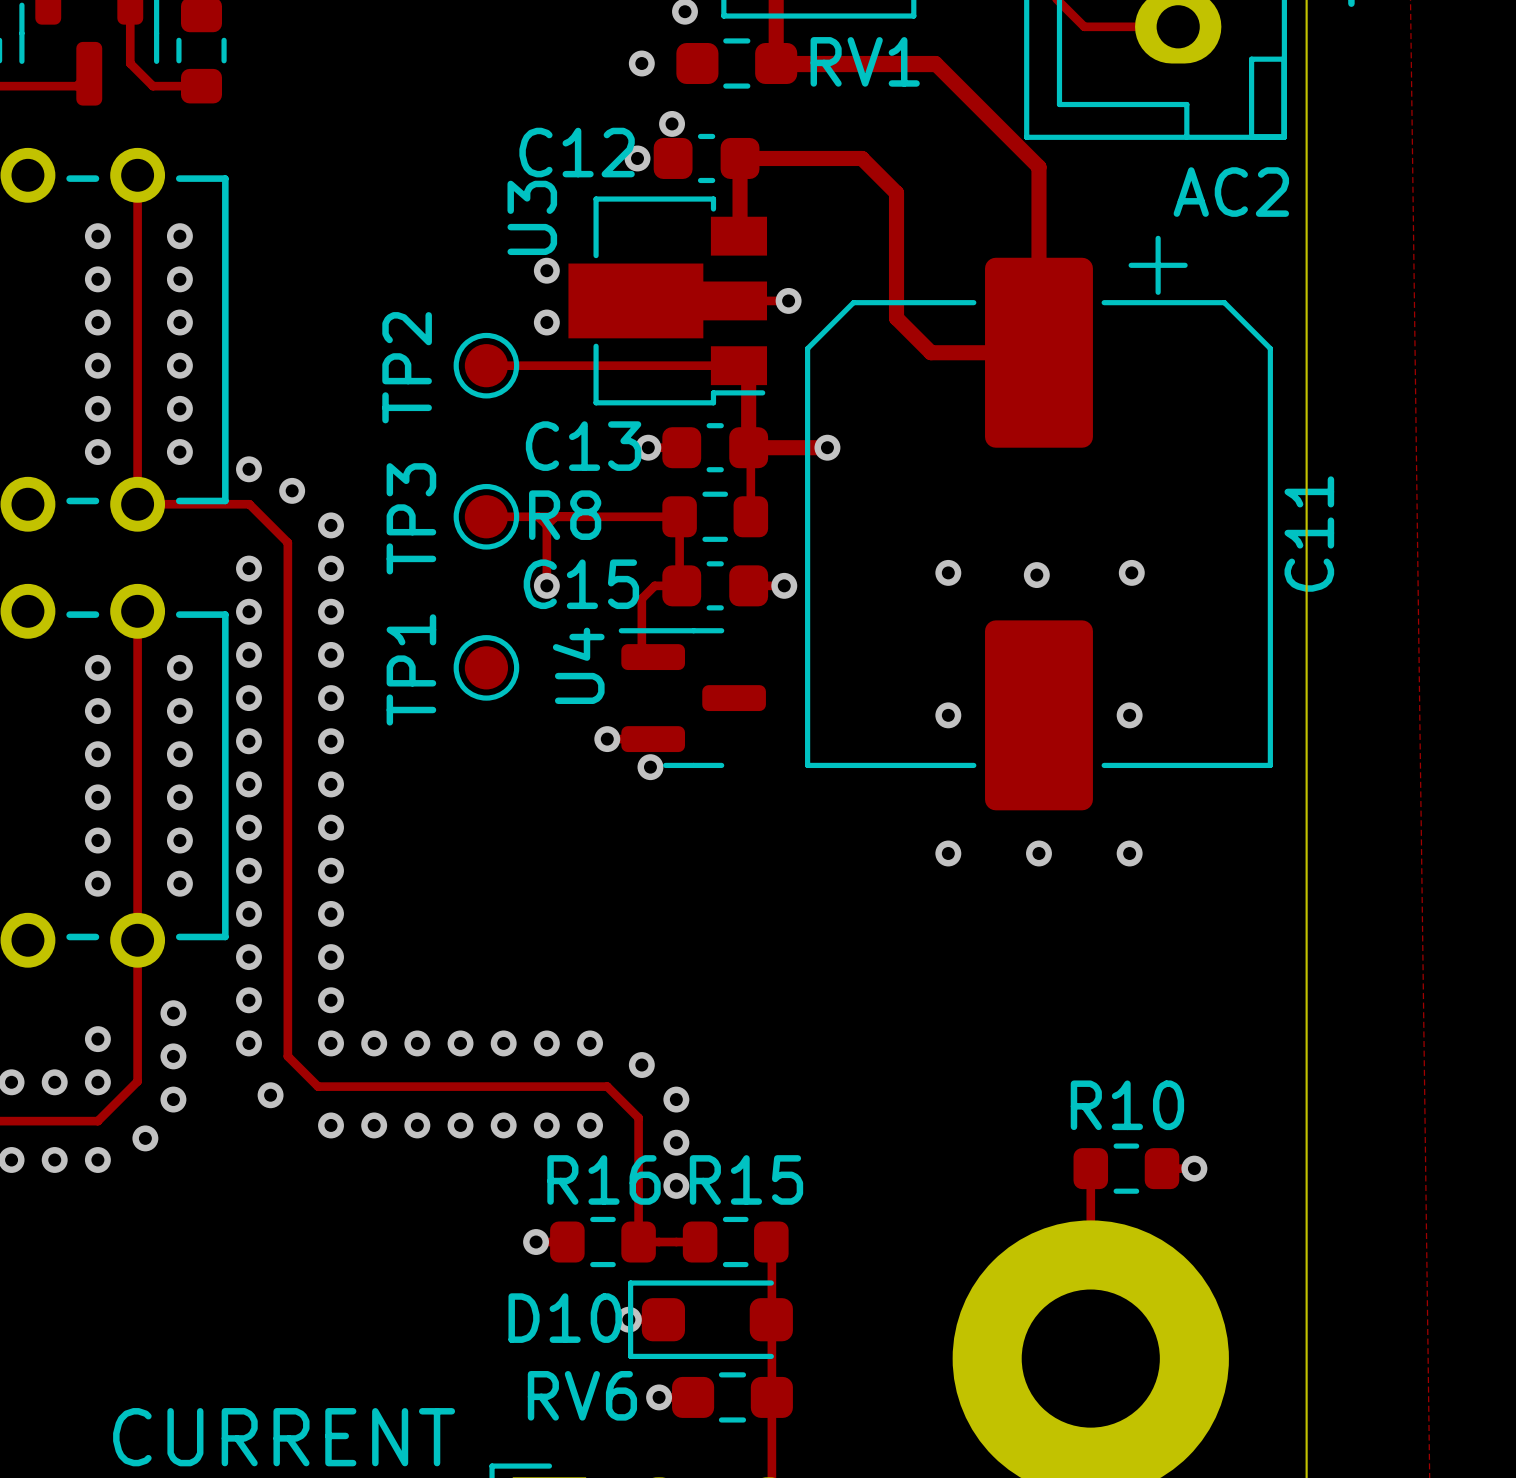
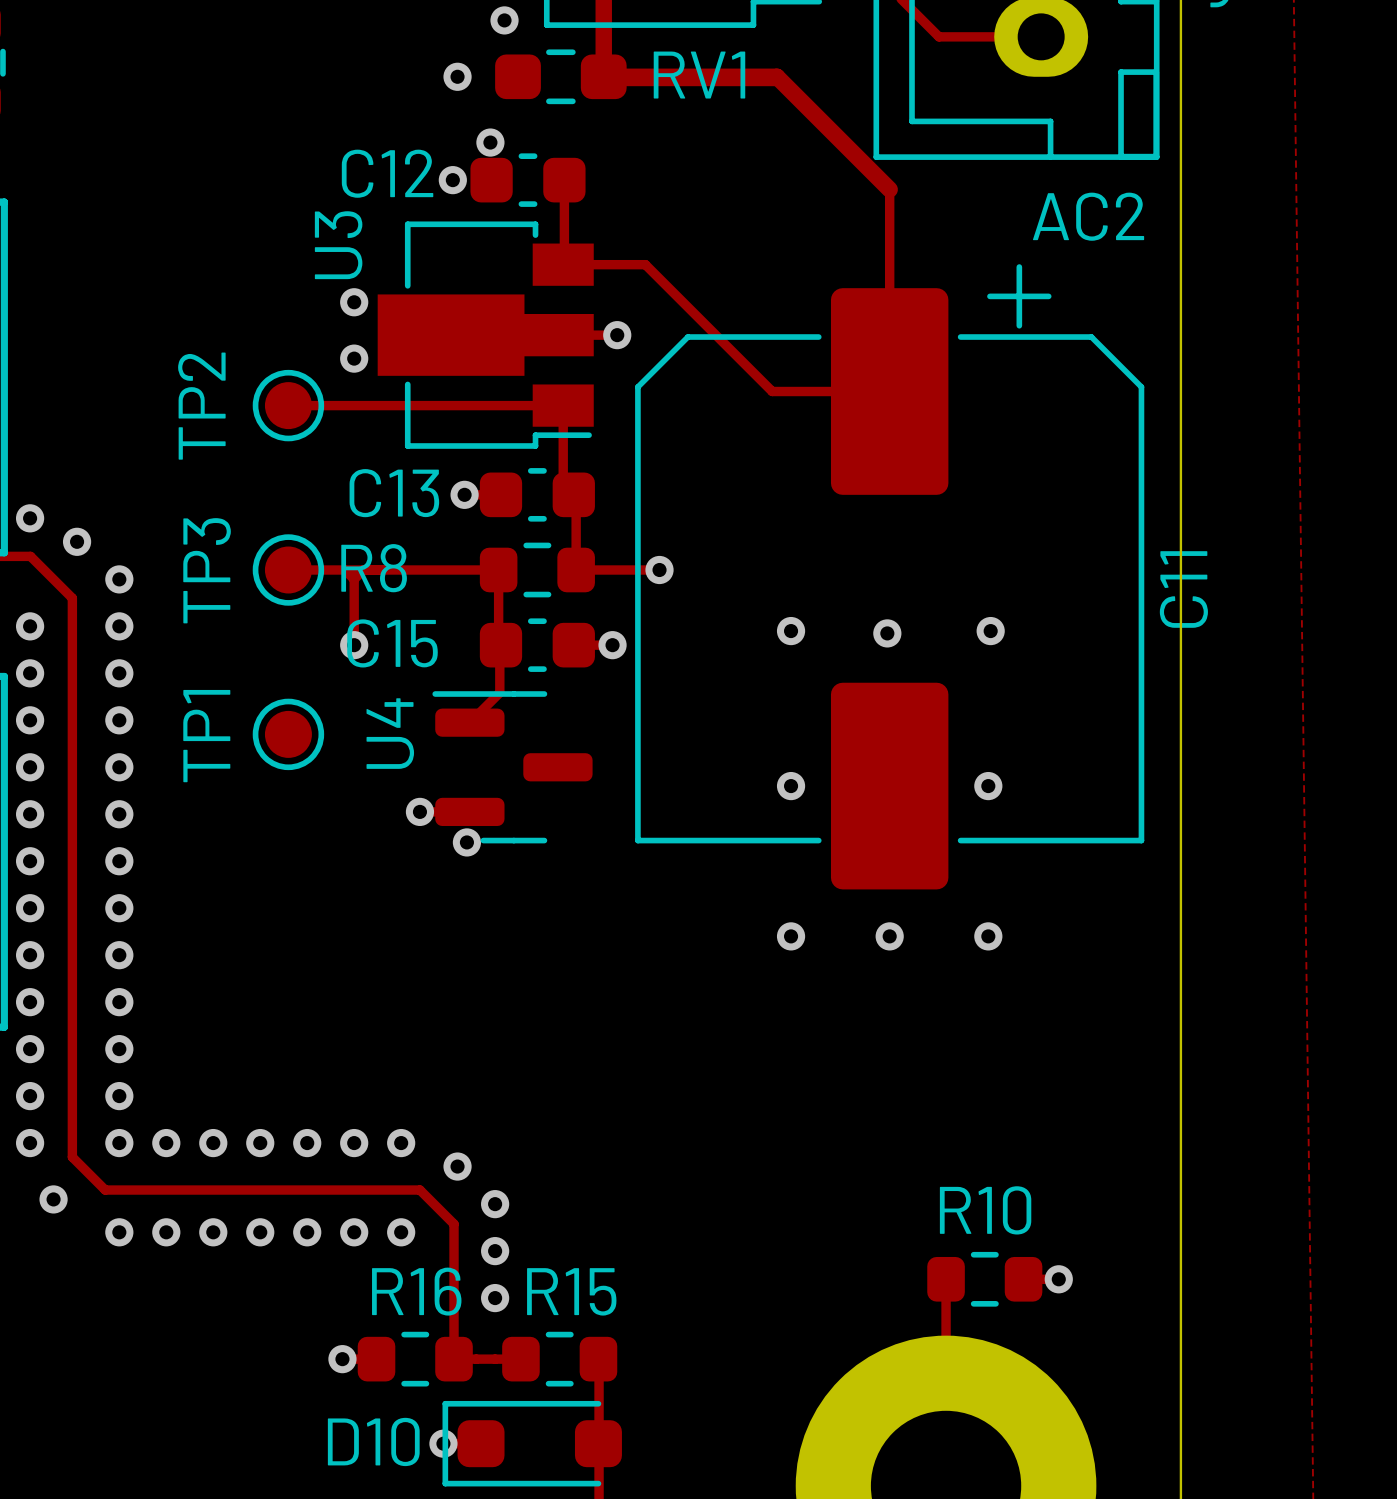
track: (740, 158) (861, 158) (896, 193) (896, 318) -> (563, 264) (645, 264) (734, 353)
track width: thick (740, 158) (738, 236) -> thin (564, 180) (563, 264)
track width: thick (1038, 167) (1038, 352) (931, 352) (896, 318) -> thin (889, 189) (889, 391) (772, 391) (734, 353)
track: (738, 365) (748, 375) (748, 447) (827, 447) -> (563, 405) (563, 484) (573, 494)
via position: (827, 447) -> (659, 570)
track: none -> (576, 570) (659, 570)
track: (681, 585) (654, 585) (641, 598) (641, 645) (653, 657) -> (500, 645) (499, 692) (469, 722)

